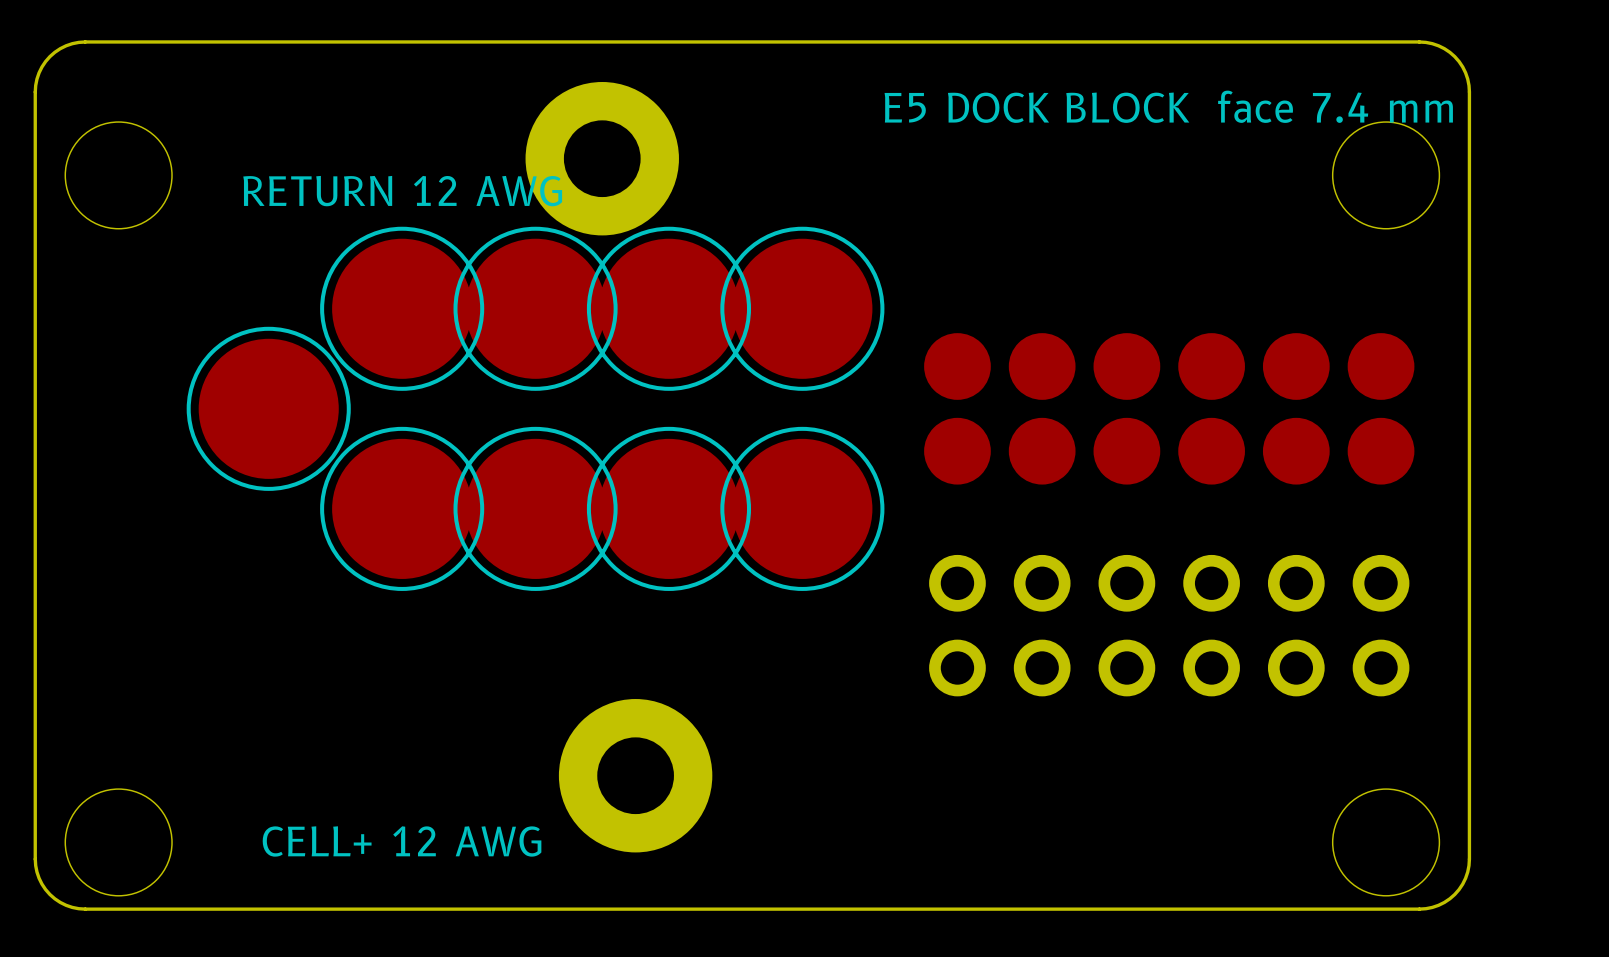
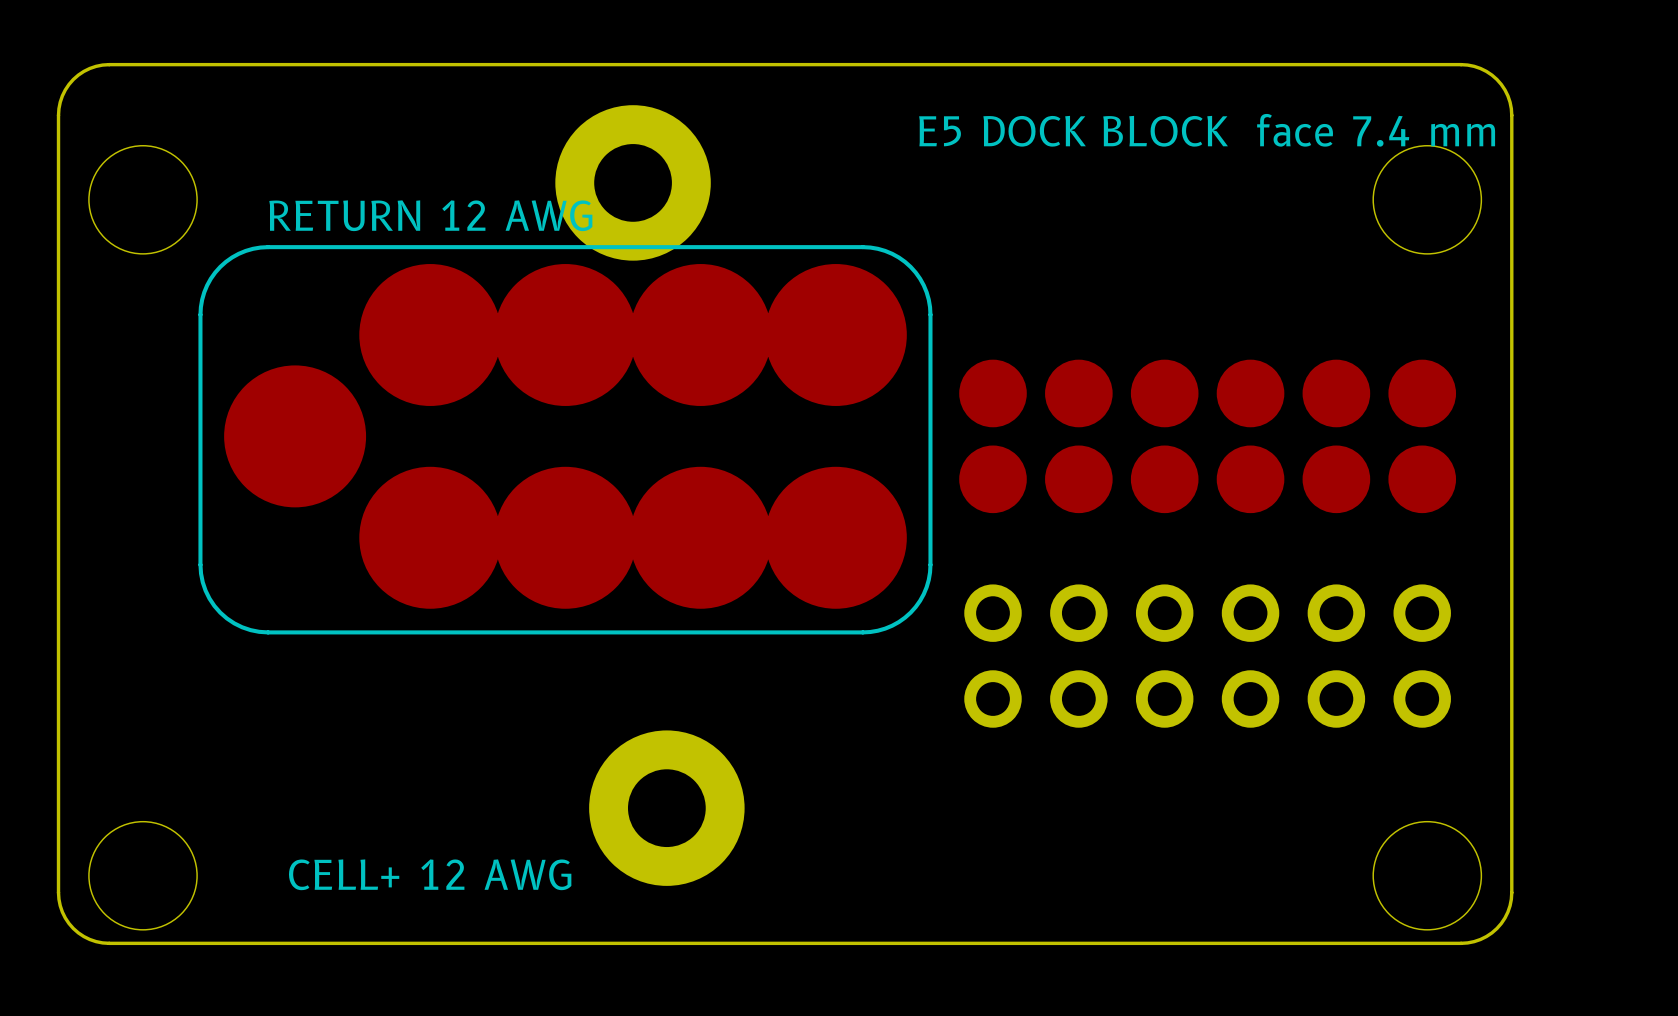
line: none -> (268, 247) (862, 247) (877, 248) (892, 253) (910, 266) (920, 278) (926, 292) (930, 307) (930, 564) (928, 579) (923, 594) (910, 612) (898, 622) (877, 630) (862, 632) (268, 632) (250, 630) (234, 623) (220, 612) (209, 598) (201, 573) (200, 307) (207, 285) (215, 272) (225, 261) (245, 250) (268, 247)
part footprint: [320, 226, 485, 391] -> [359, 264, 502, 406]
part footprint: [453, 226, 618, 391] -> [494, 264, 637, 406]
part footprint: [586, 226, 752, 391] -> [629, 264, 772, 406]
part footprint: [720, 226, 885, 391] -> [764, 264, 907, 406]
part footprint: [186, 326, 351, 491] -> [224, 365, 367, 508]
part footprint: [320, 426, 485, 591] -> [359, 466, 502, 609]
part footprint: [453, 426, 618, 591] -> [494, 466, 637, 609]
part footprint: [586, 426, 752, 591] -> [629, 466, 772, 609]
part footprint: [720, 426, 885, 591] -> [764, 466, 907, 609]

